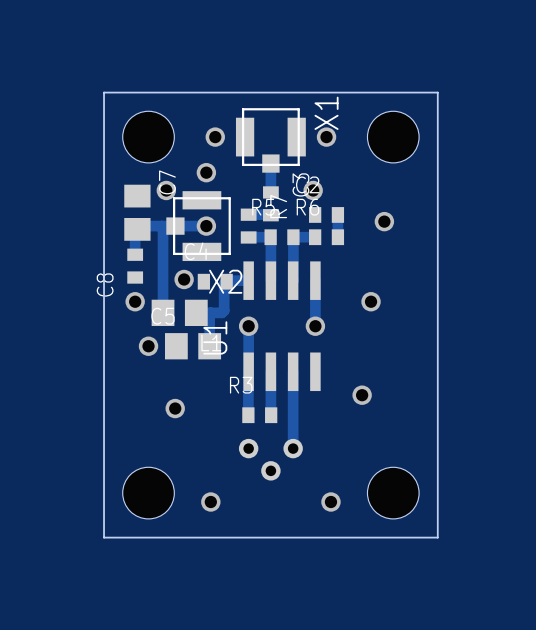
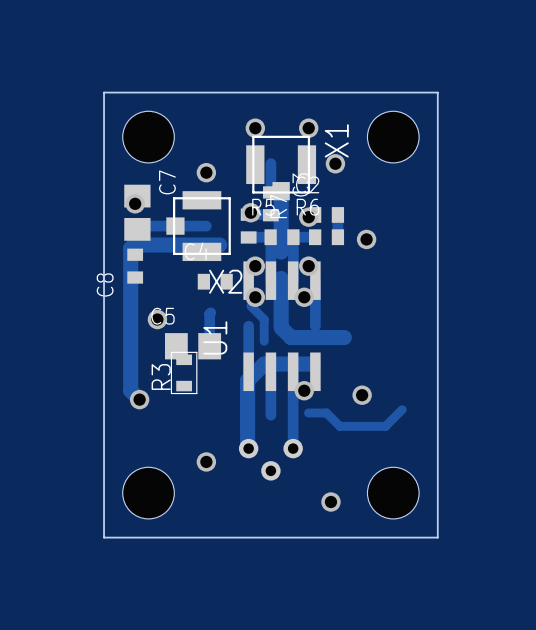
via: none -> (255, 128)
via: none -> (308, 128)
via: (215, 137) -> none
via: (326, 137) -> none
X1 position: (270, 140) -> (281, 168)
via: none -> (335, 163)
via position: (166, 190) -> (135, 203)
via: (313, 190) -> none
track: none -> (281, 191) (281, 252)
via: none -> (250, 212)
via: none -> (308, 217)
via position: (384, 221) -> (366, 239)
track: (161, 226) (163, 312) -> none
via: (206, 226) -> none
track: none -> (219, 245) (134, 245) (130, 248) (130, 390) (139, 399)
via: none -> (255, 266)
via: none -> (308, 266)
track: none -> (281, 278) (281, 327) (291, 337) (344, 337)
via: (184, 279) -> none
track: (248, 280) (226, 280) (224, 284) (224, 310) (221, 312) (196, 312) -> none
via: none -> (304, 297)
via: (135, 301) -> none
via: (371, 301) -> none
track: none -> (250, 306) (264, 319) (264, 341)
part: (179, 312) -> none
via: none -> (157, 319)
via position: (248, 326) -> (255, 297)
via: (315, 326) -> none
via: (148, 346) -> none
track: none -> (312, 364) (264, 364) (247, 380) (248, 448)
via: none -> (304, 390)
via: none -> (139, 399)
R3 footprint: [242, 407, 278, 424] -> [170, 351, 198, 394]
via: (175, 408) -> none
track: none -> (402, 409) (385, 426) (339, 426) (326, 412) (308, 412)
via: none -> (206, 461)
via: (210, 502) -> none

